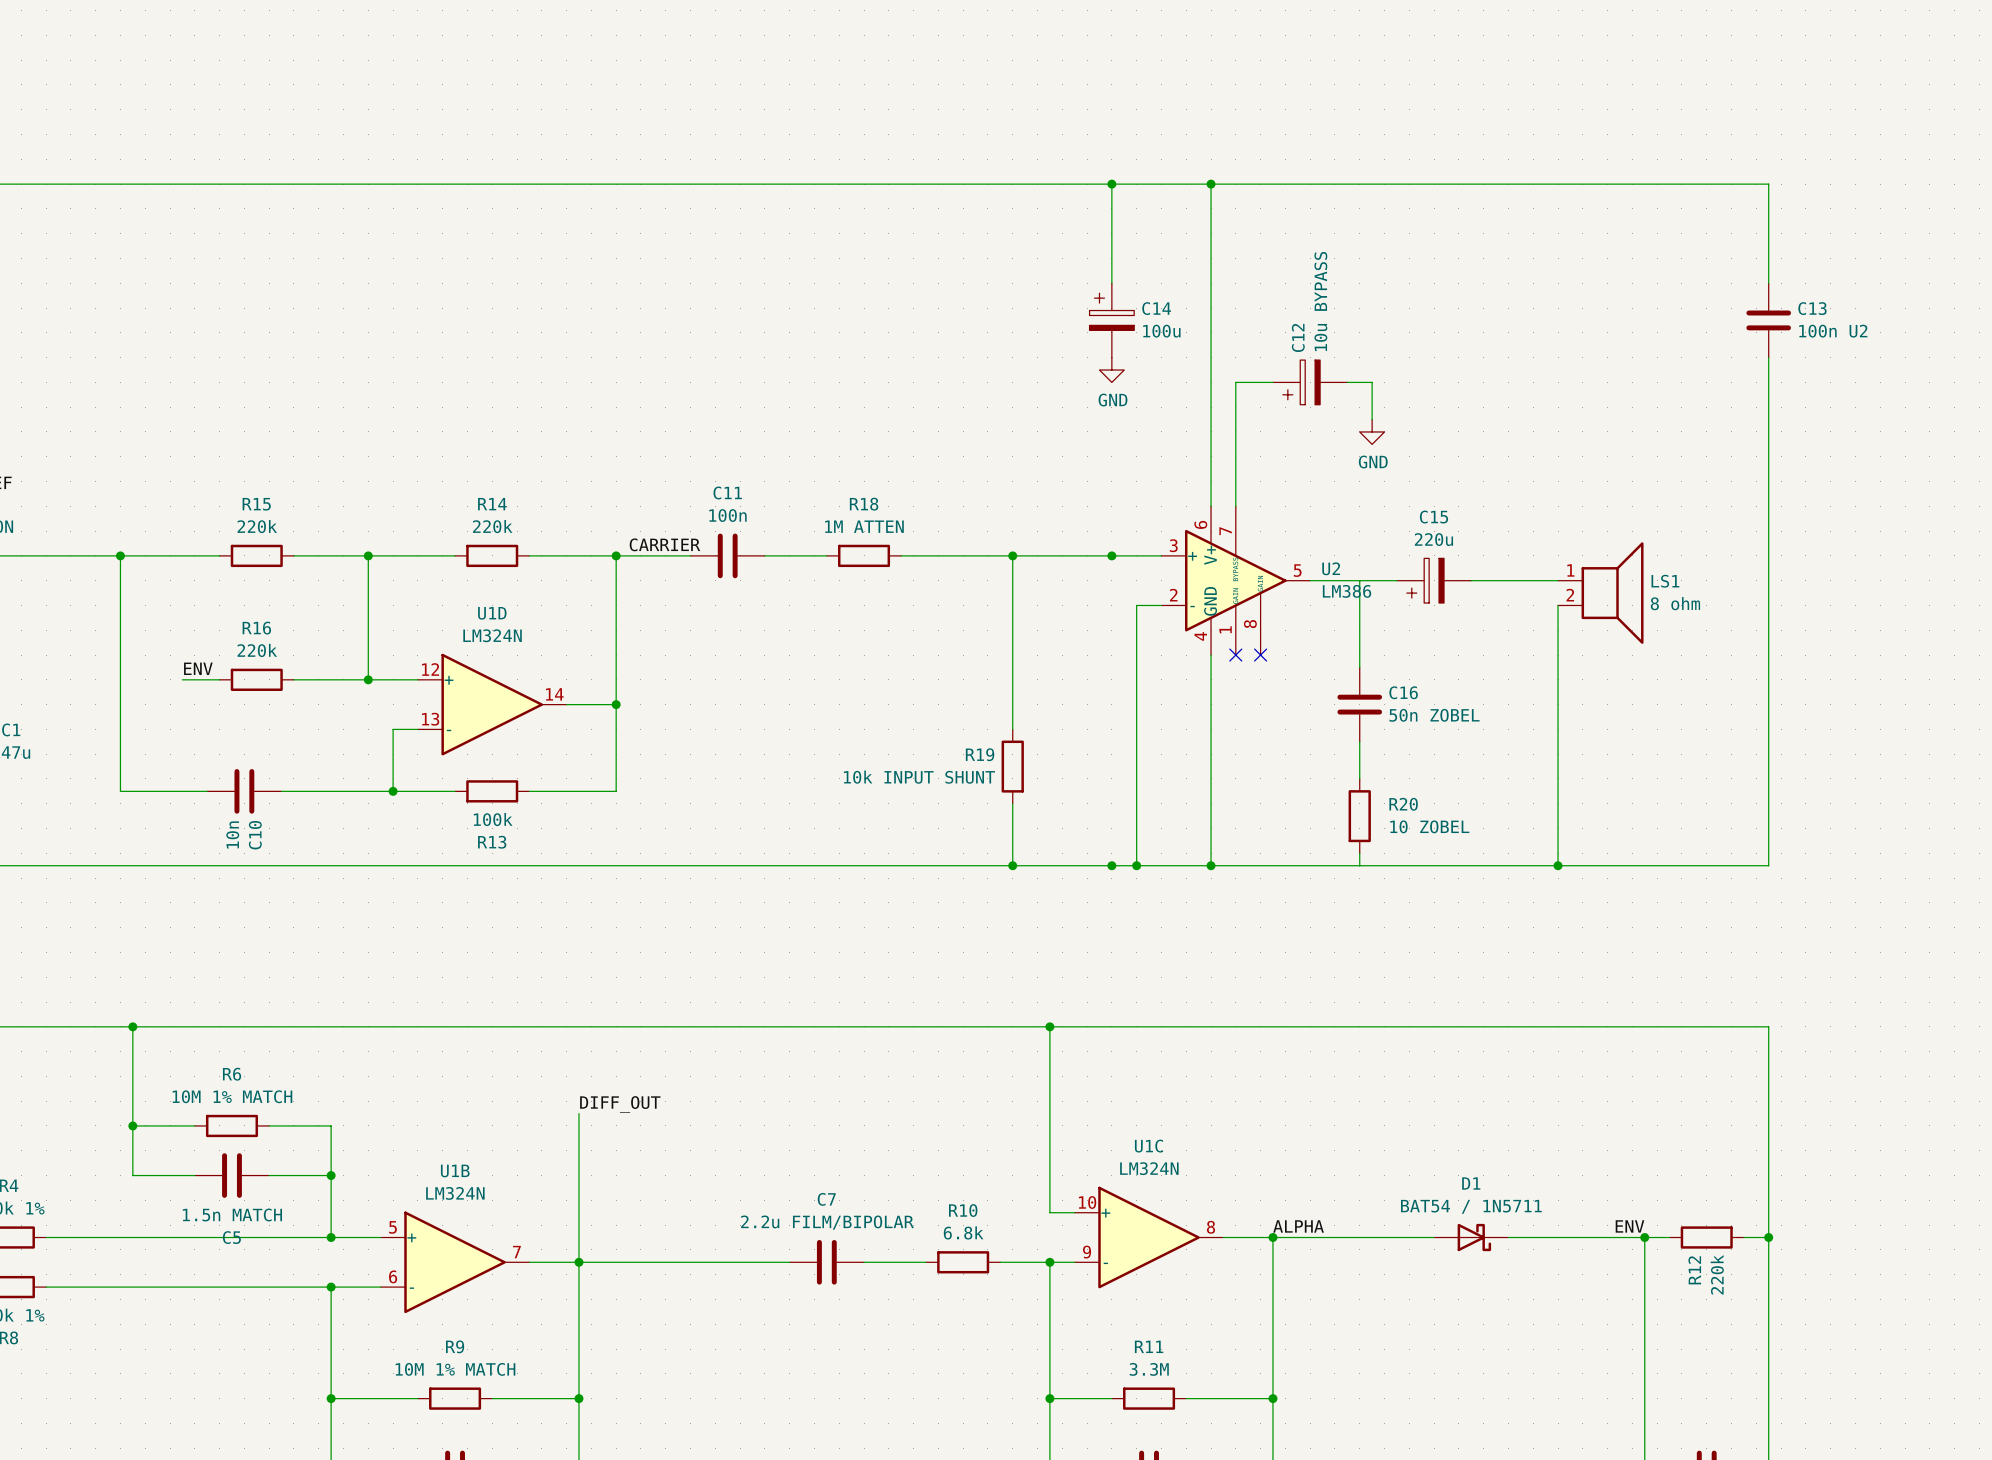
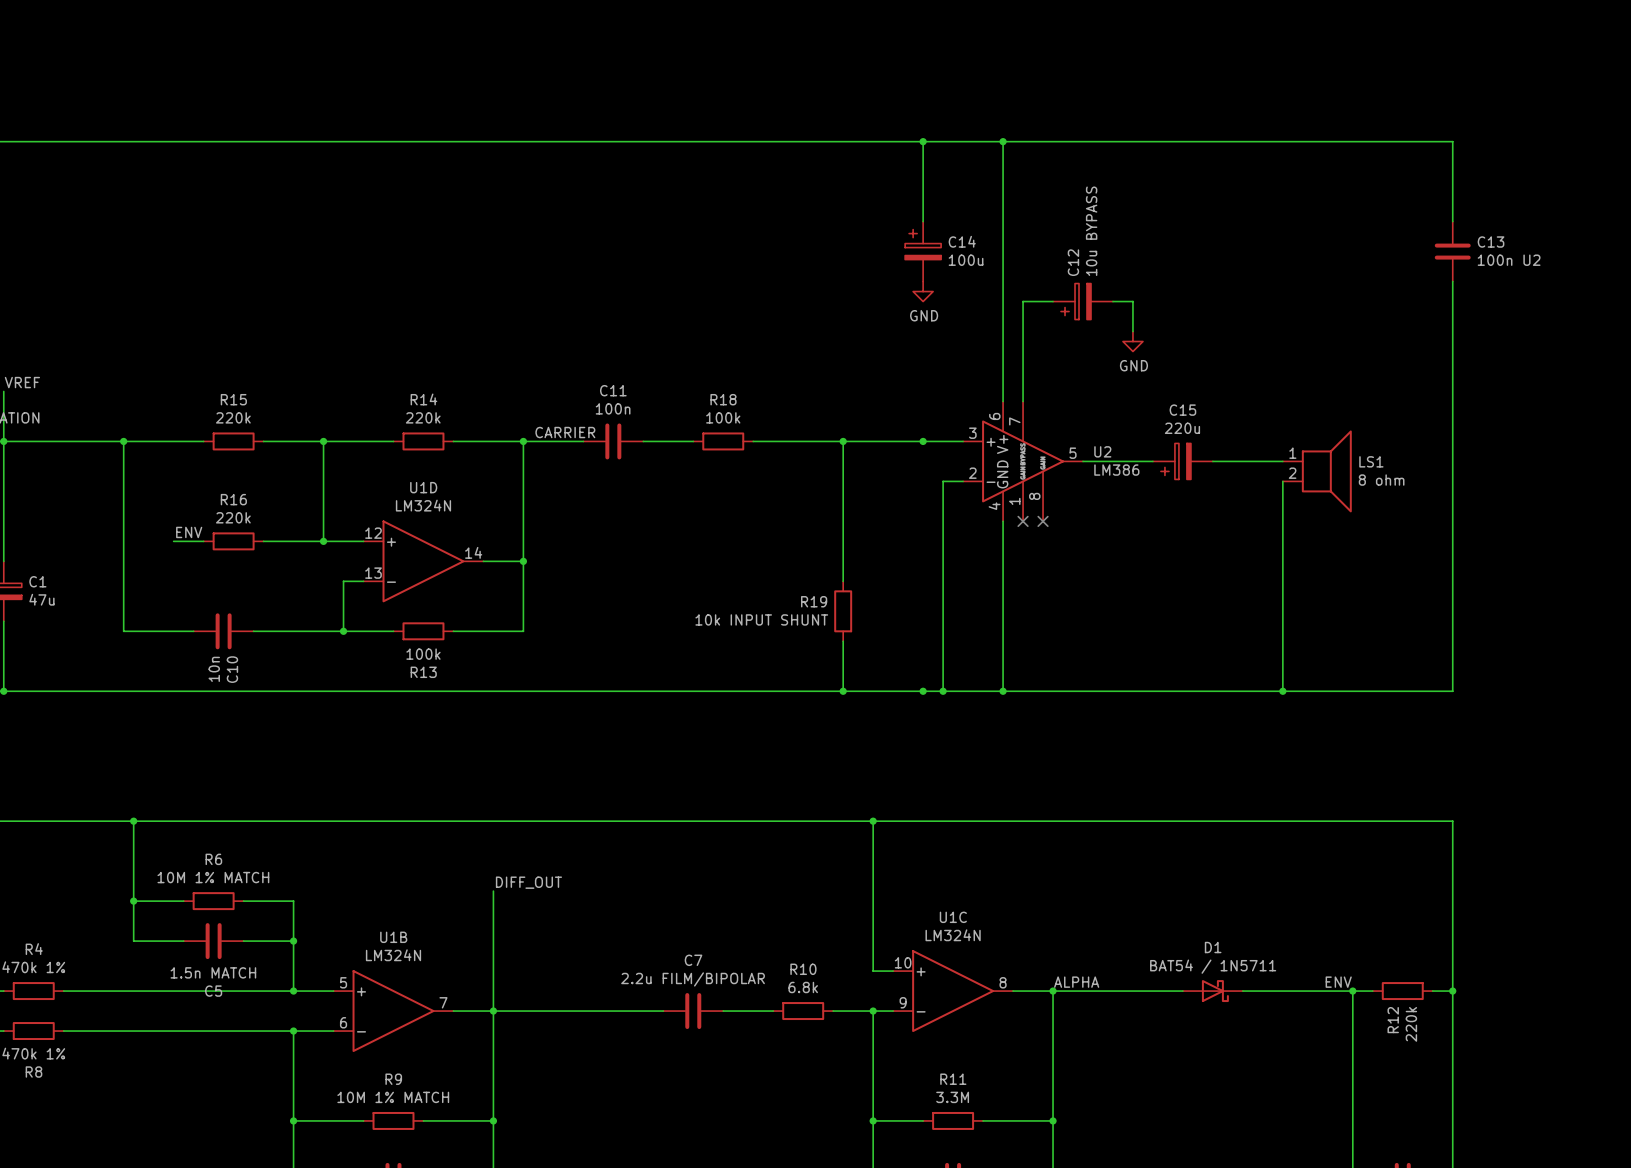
R18 value: 1M ATTEN (864, 526) -> 100k (723, 417)
wire: (1359, 580) (1359, 667) -> none
C16: 50n ZOBEL (1359, 704) -> none
wire: (1359, 741) (1359, 778) -> none
R20: 10 ZOBEL (1359, 816) -> none
wire: (1359, 853) (1359, 865) -> none

